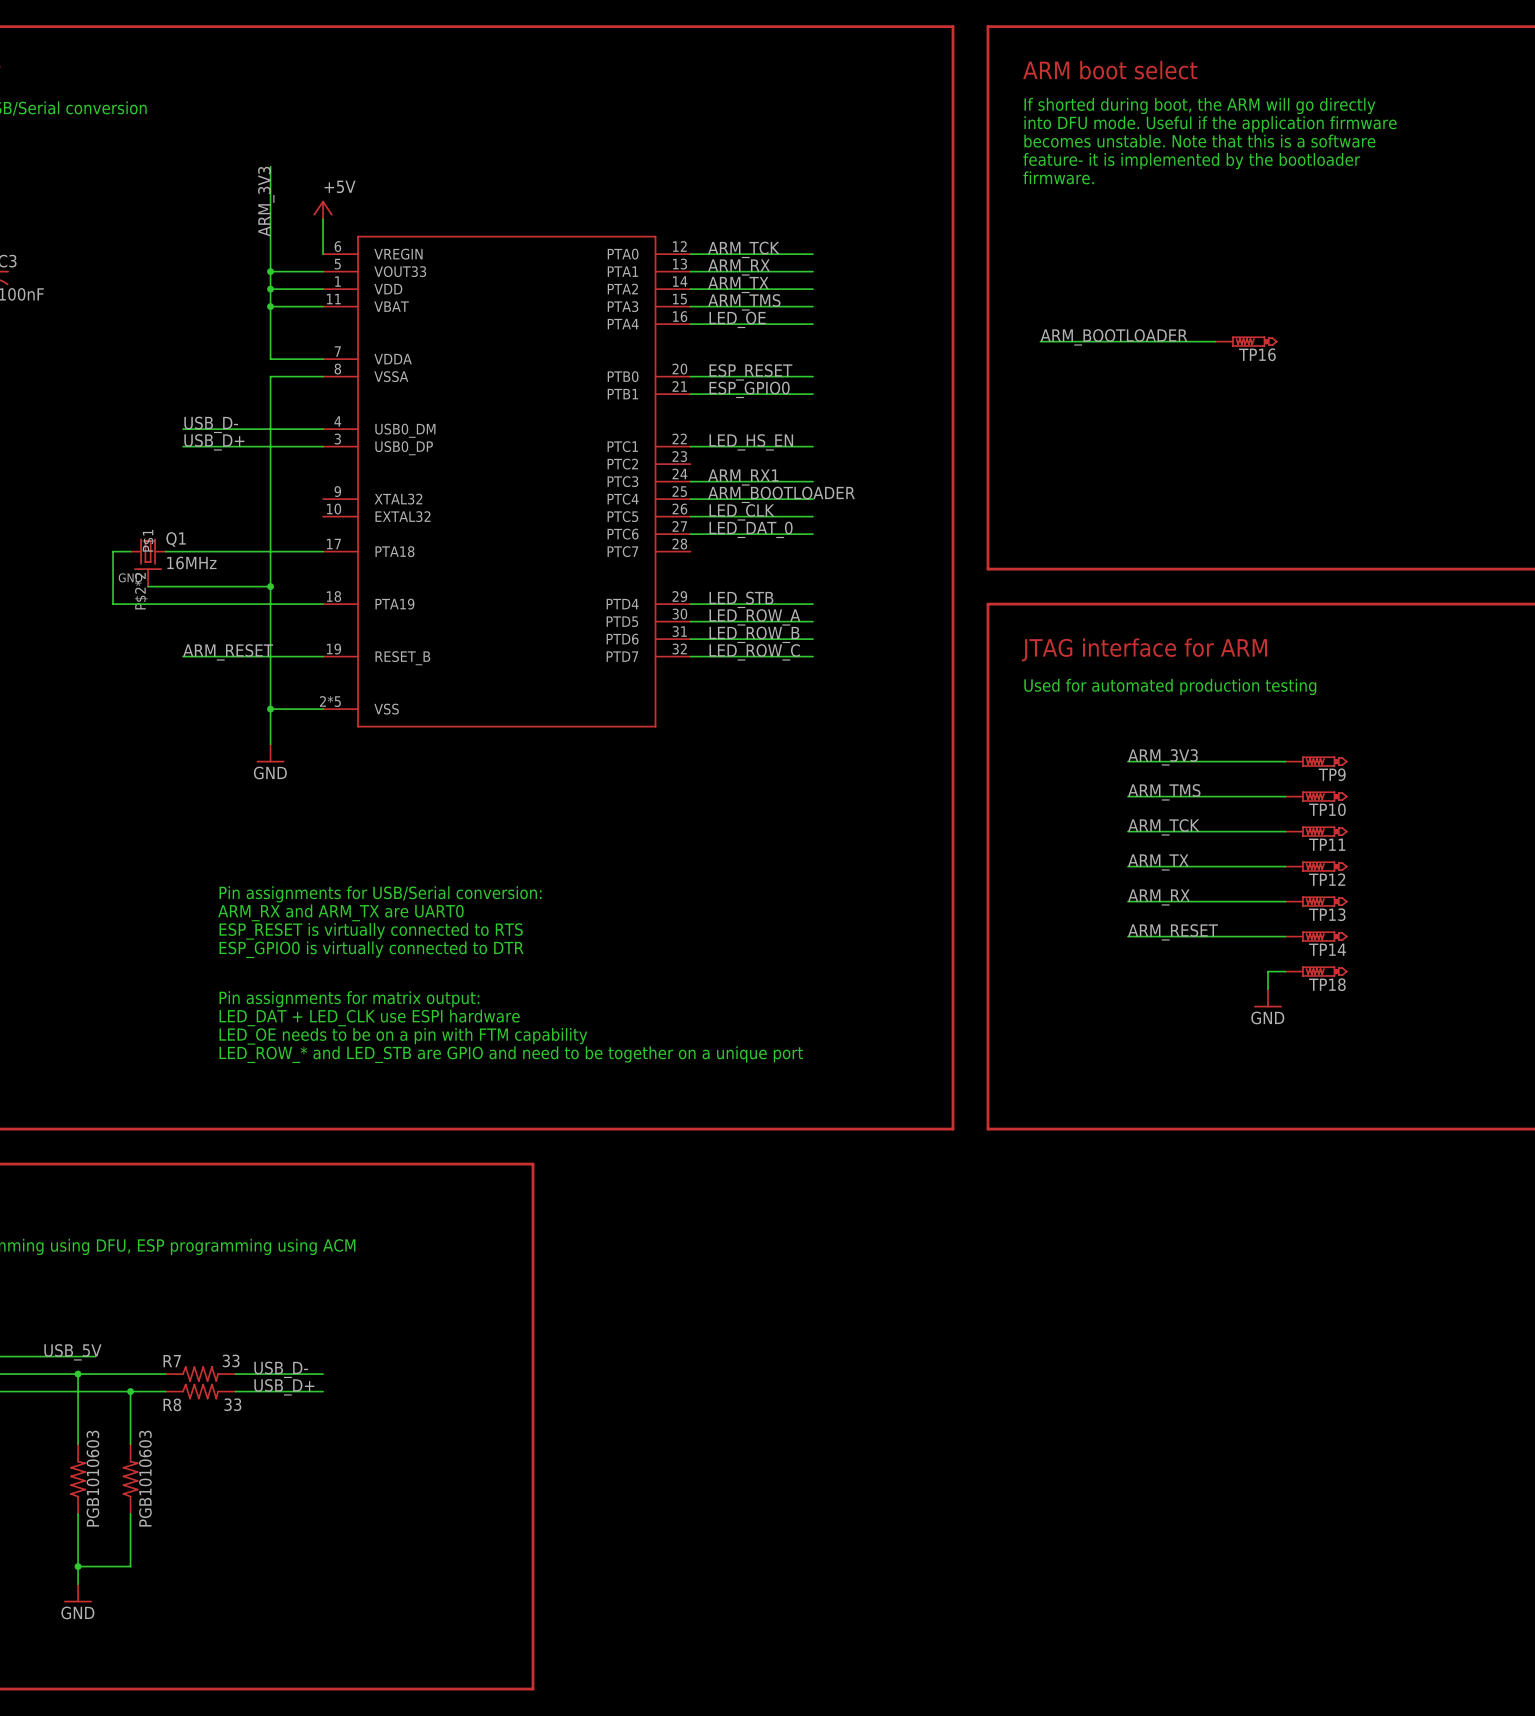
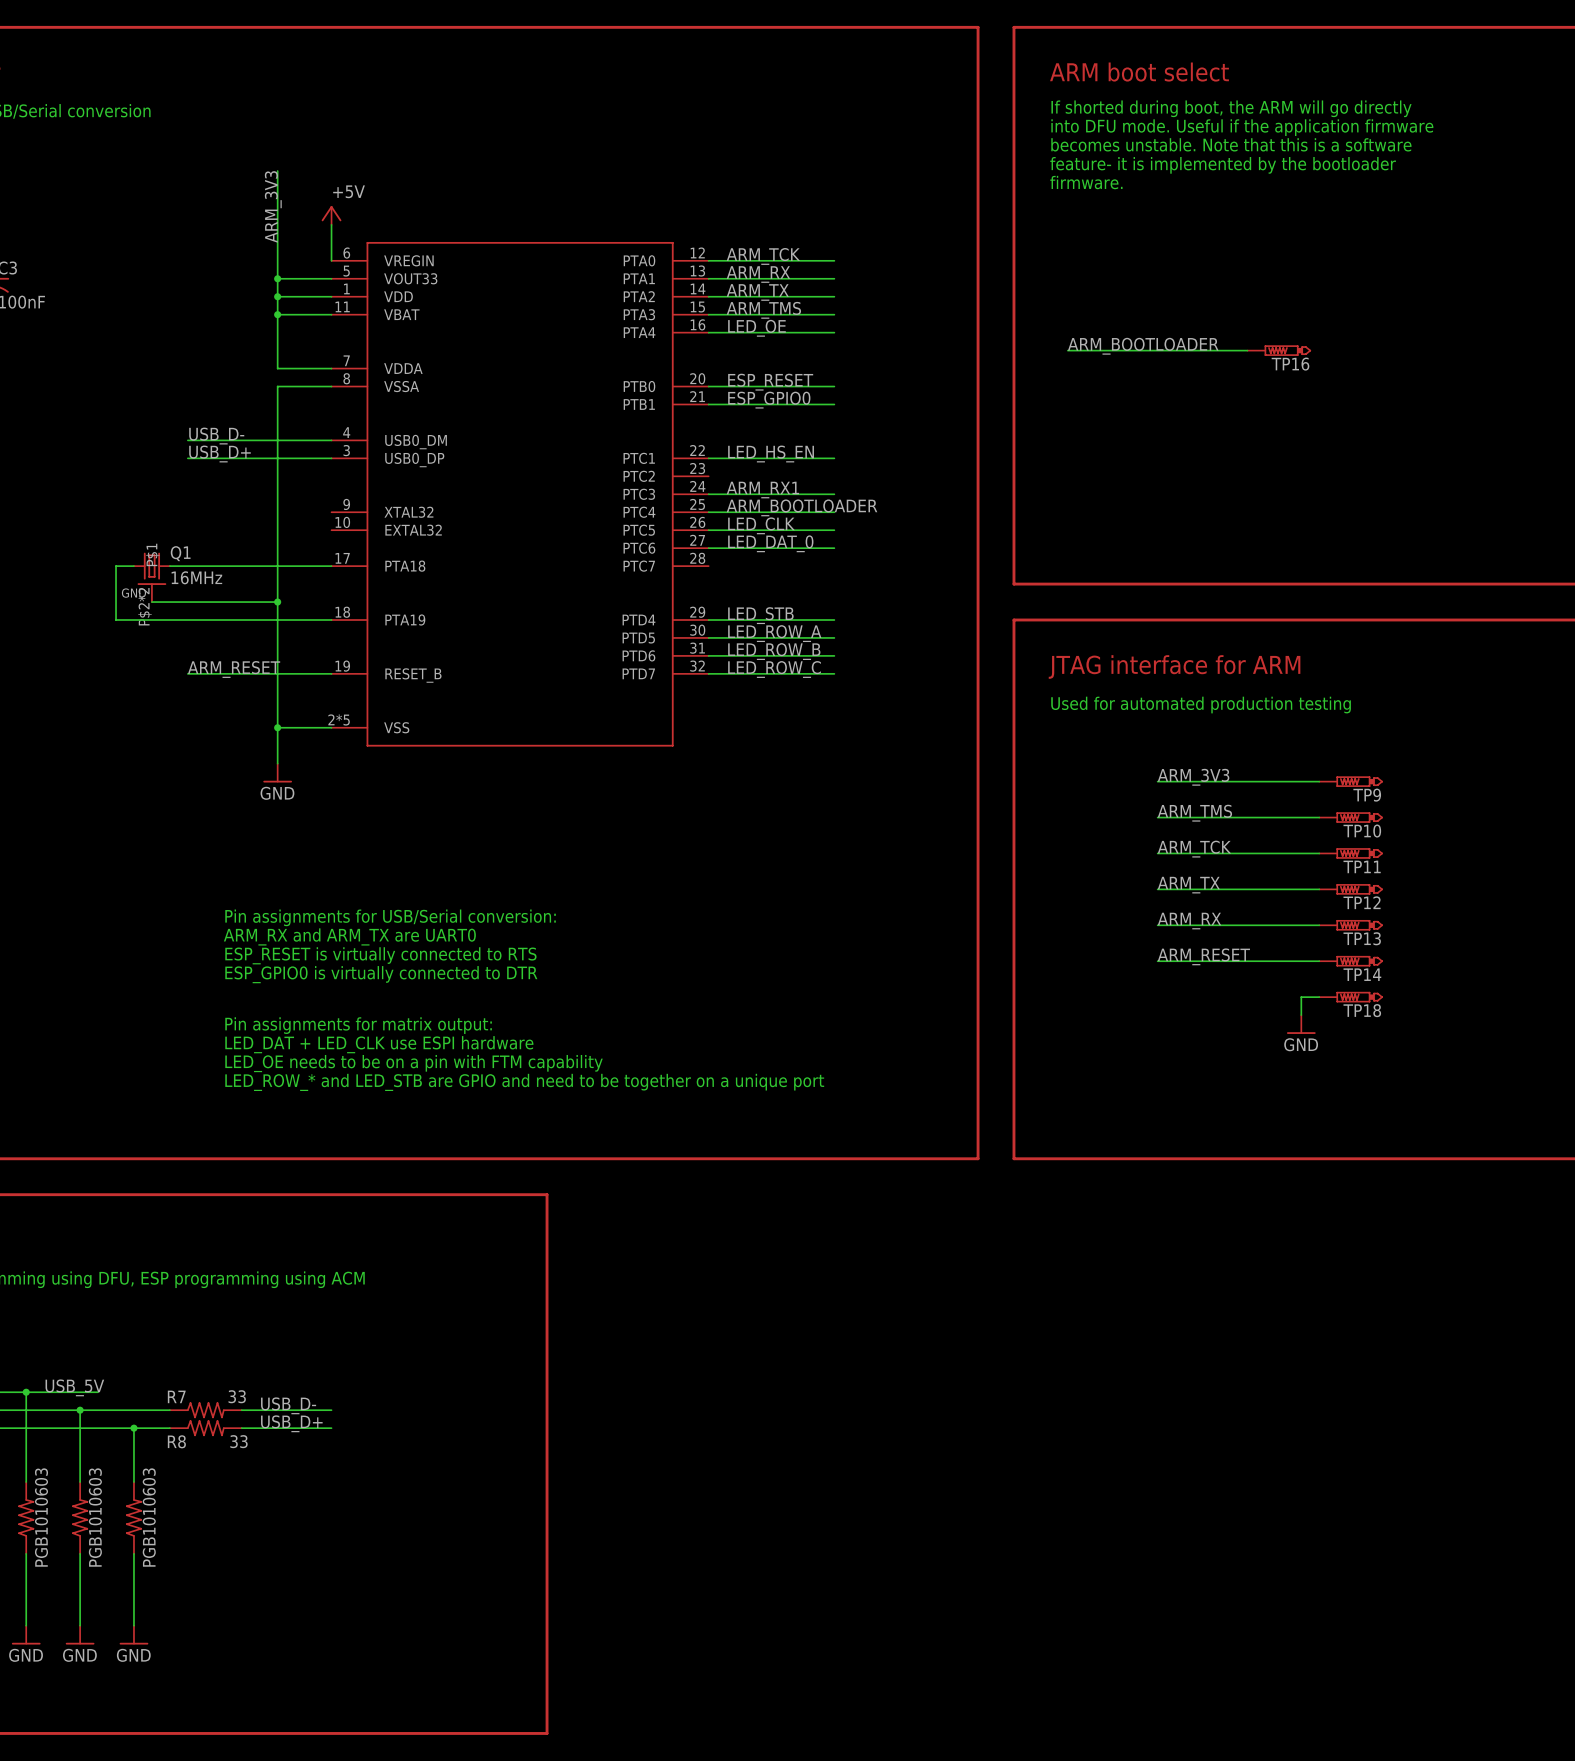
wire: none -> (26, 1392) (26, 1482)
junction: none -> (26, 1392)
part: none -> PGB1010603 (26, 1517)
wire: none -> (26, 1553) (26, 1625)
wire: (78, 1566) (130, 1566) -> (133, 1625) (133, 1607)
junction: (78, 1566) -> none
power symbol: none -> GND (26, 1635)
power symbol: none -> GND (133, 1635)

